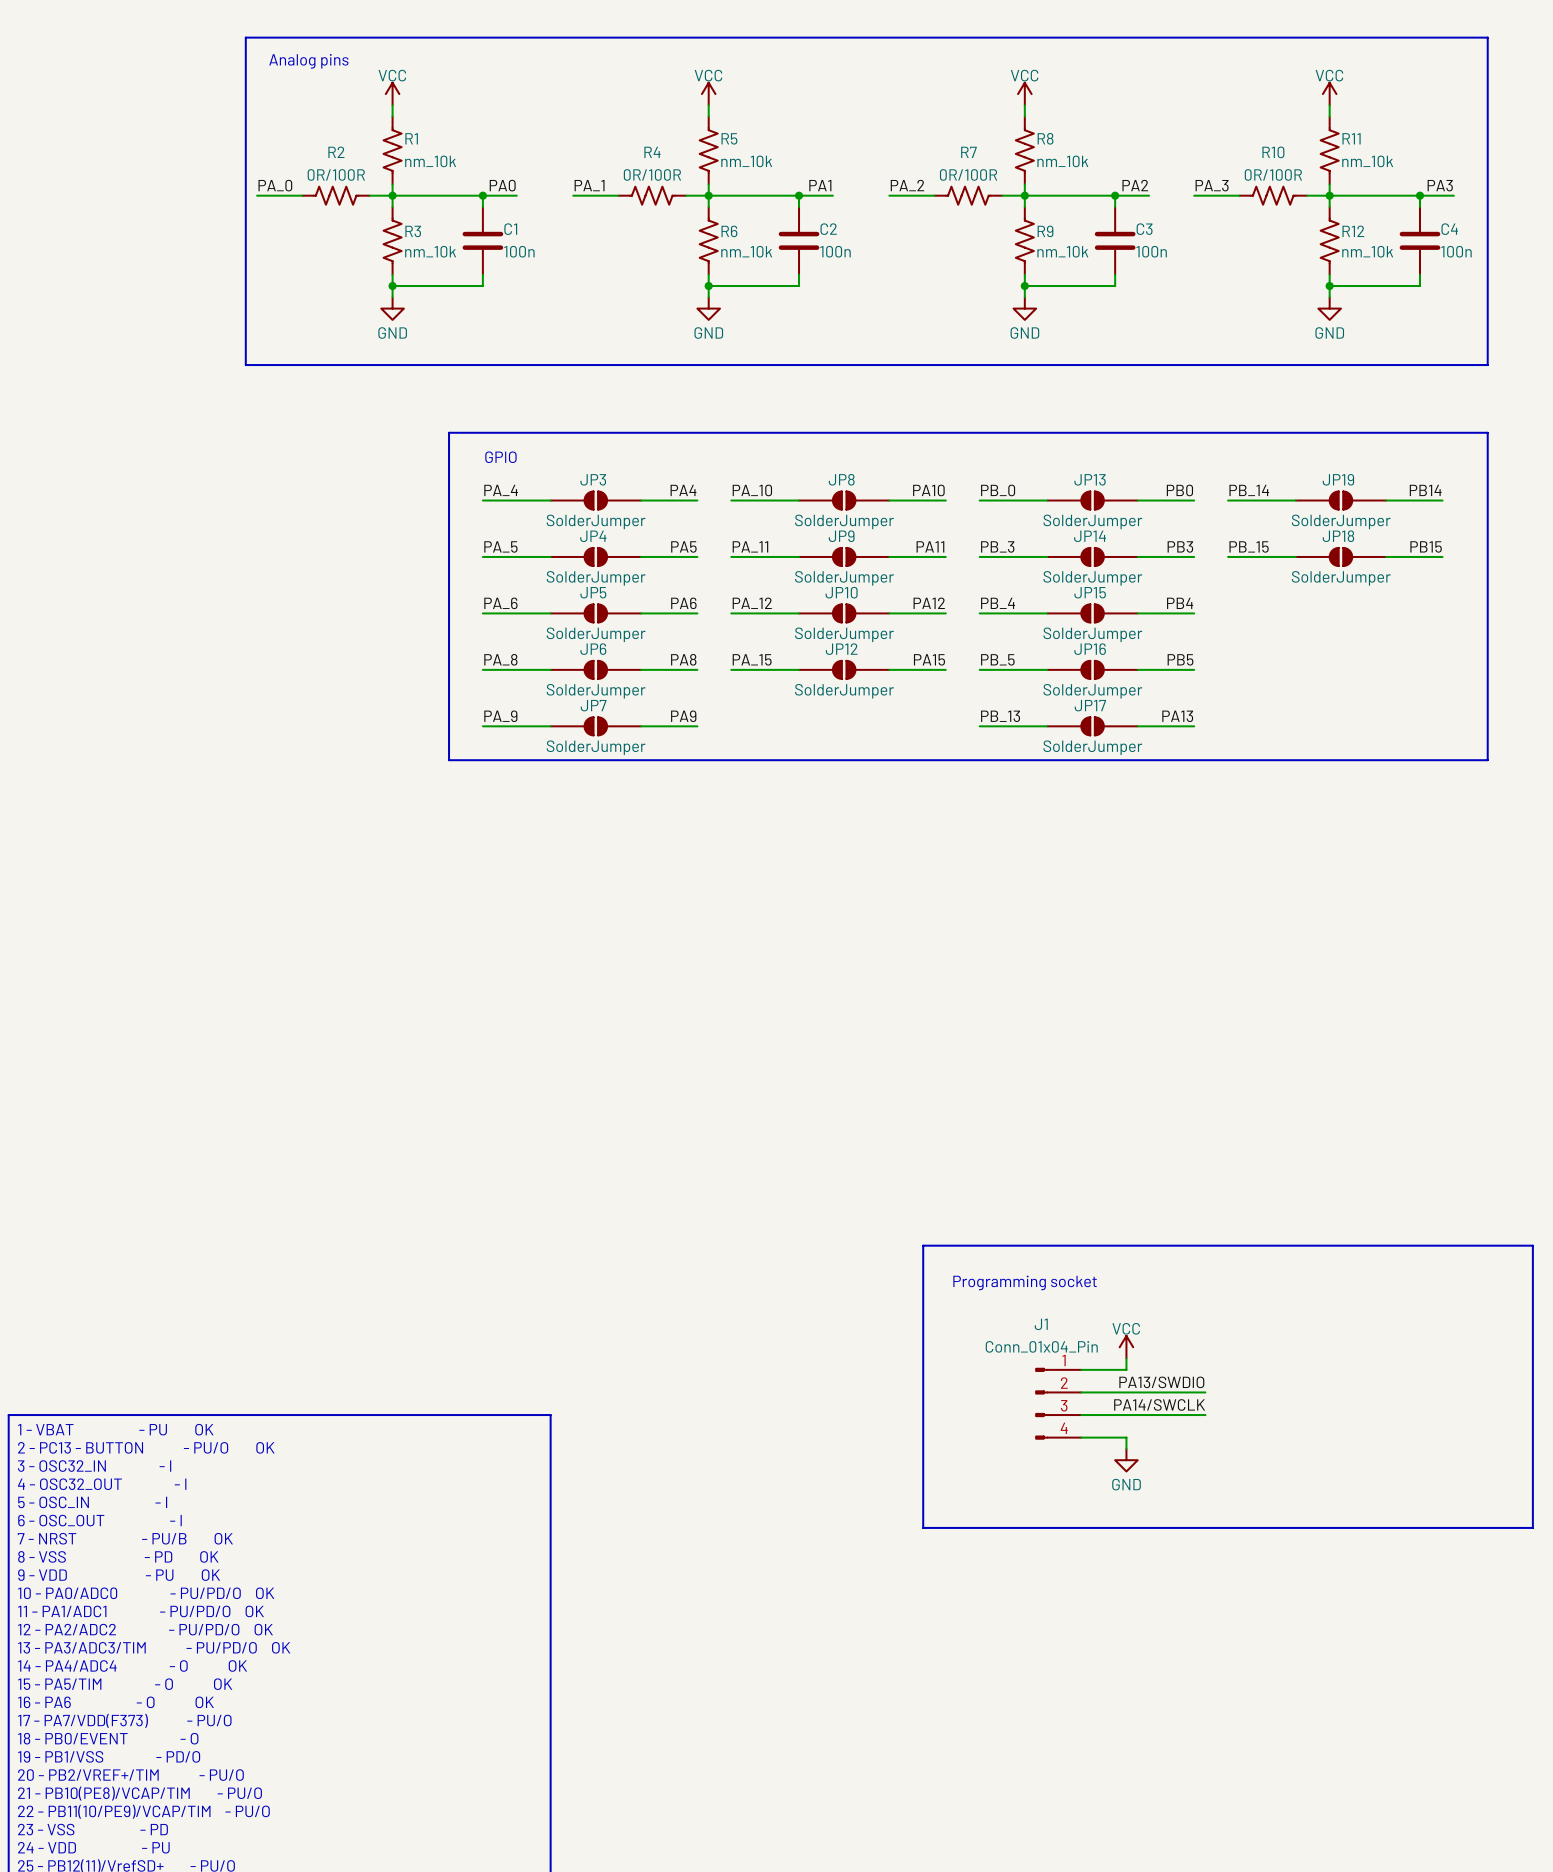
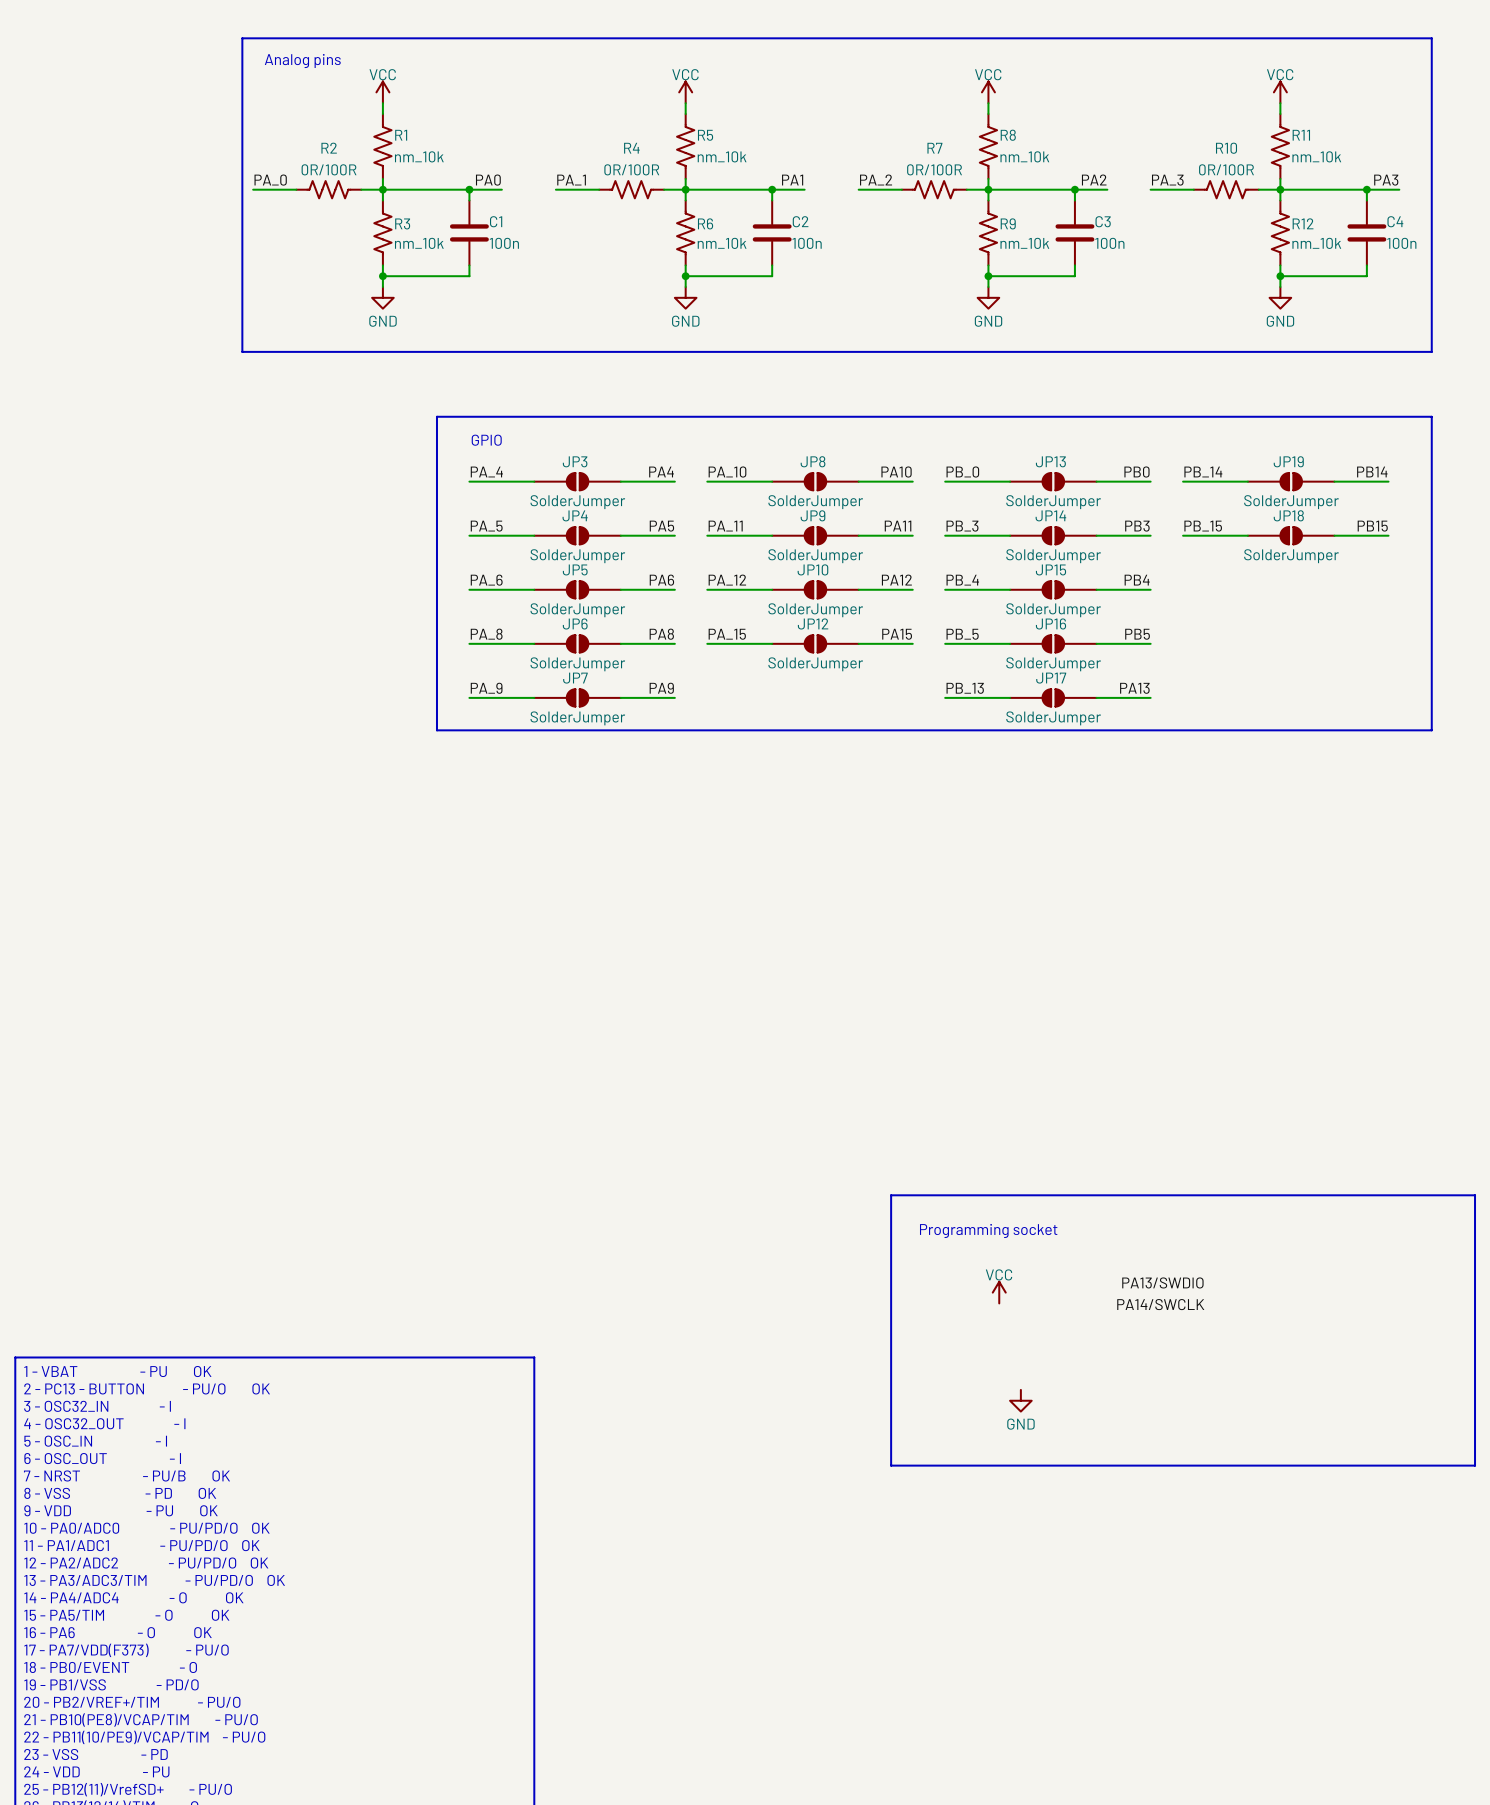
power symbol position: VCC (1126, 1347) -> VCC (999, 1292)
wire: (1126, 1358) (1126, 1369) (1081, 1369) -> none
label position: PA13/SWDIO (1161, 1382) -> PA13/SWDIO (1162, 1282)
wire: (1081, 1392) (1205, 1392) -> none
J1: Conn_01x04_Pin (1058, 1403) -> none
label position: PA14/SWCLK (1159, 1404) -> PA14/SWCLK (1160, 1304)
wire: (1081, 1415) (1205, 1415) -> none
wire: (1081, 1437) (1126, 1437) (1126, 1448) -> none
power symbol position: GND (1126, 1460) -> GND (1020, 1400)

